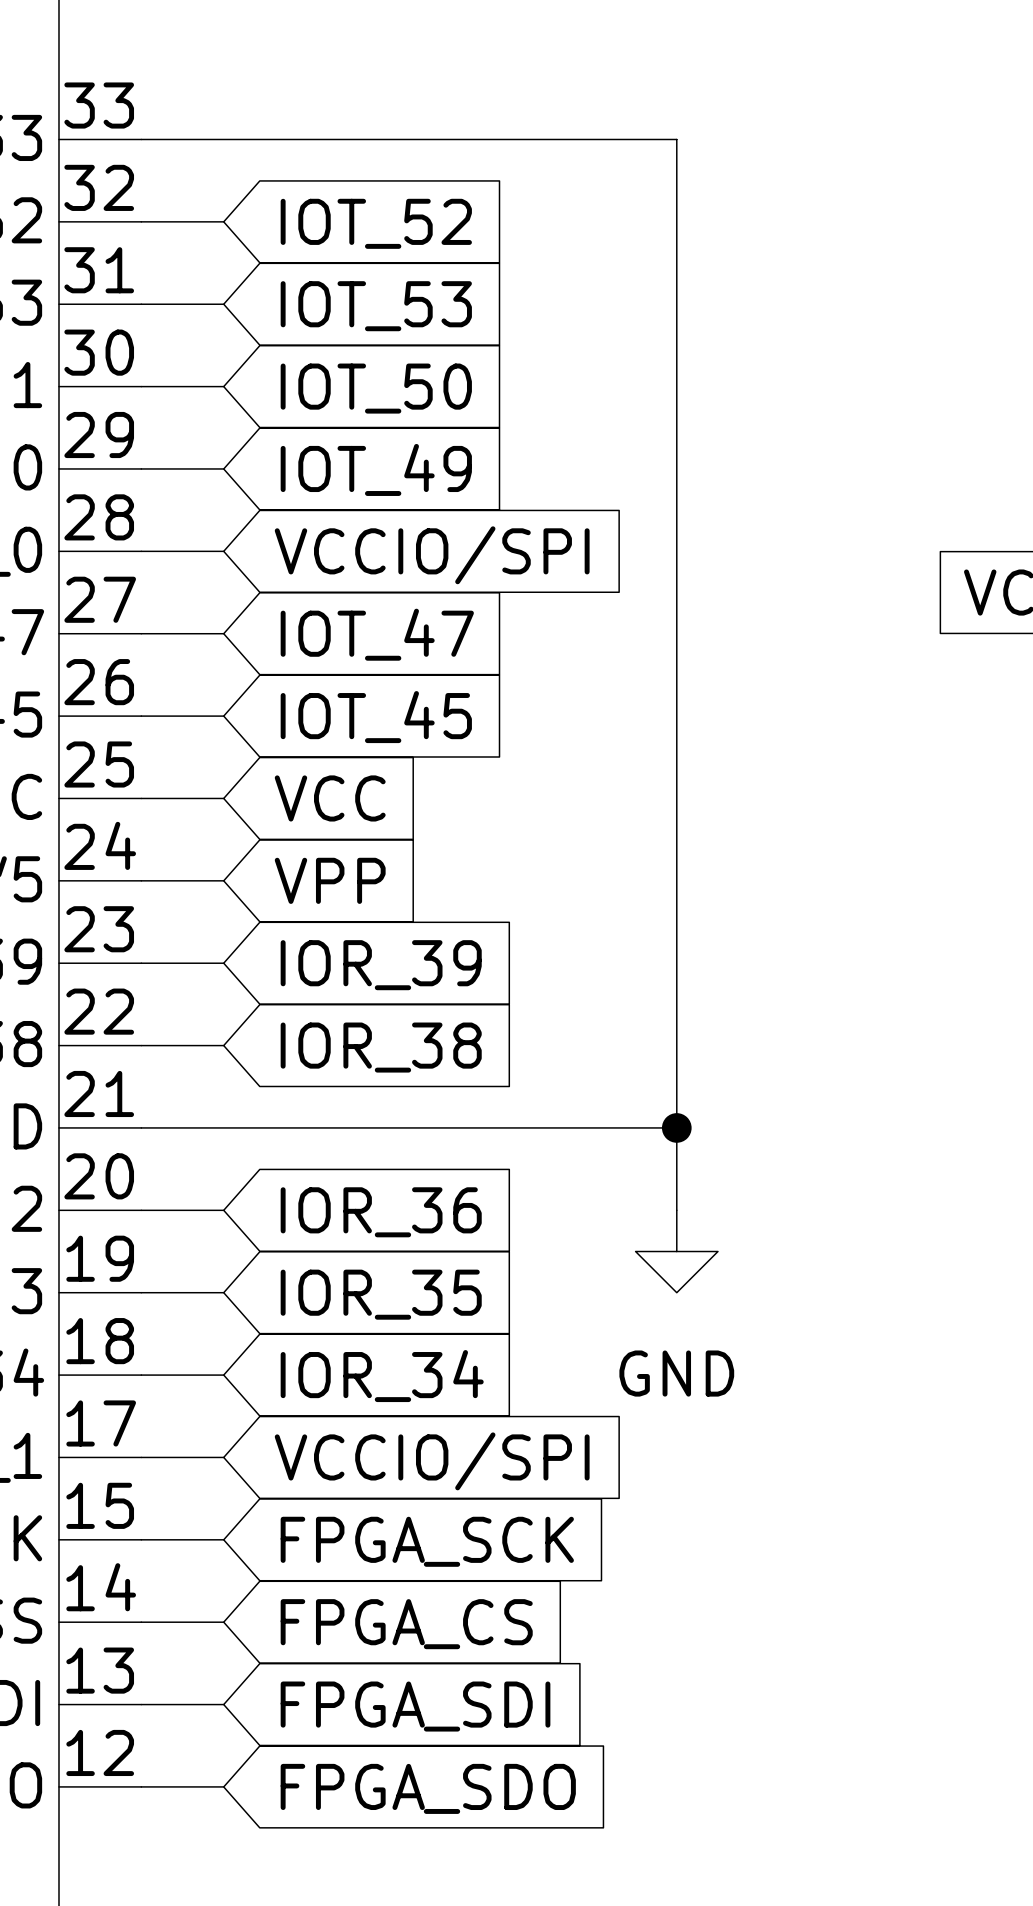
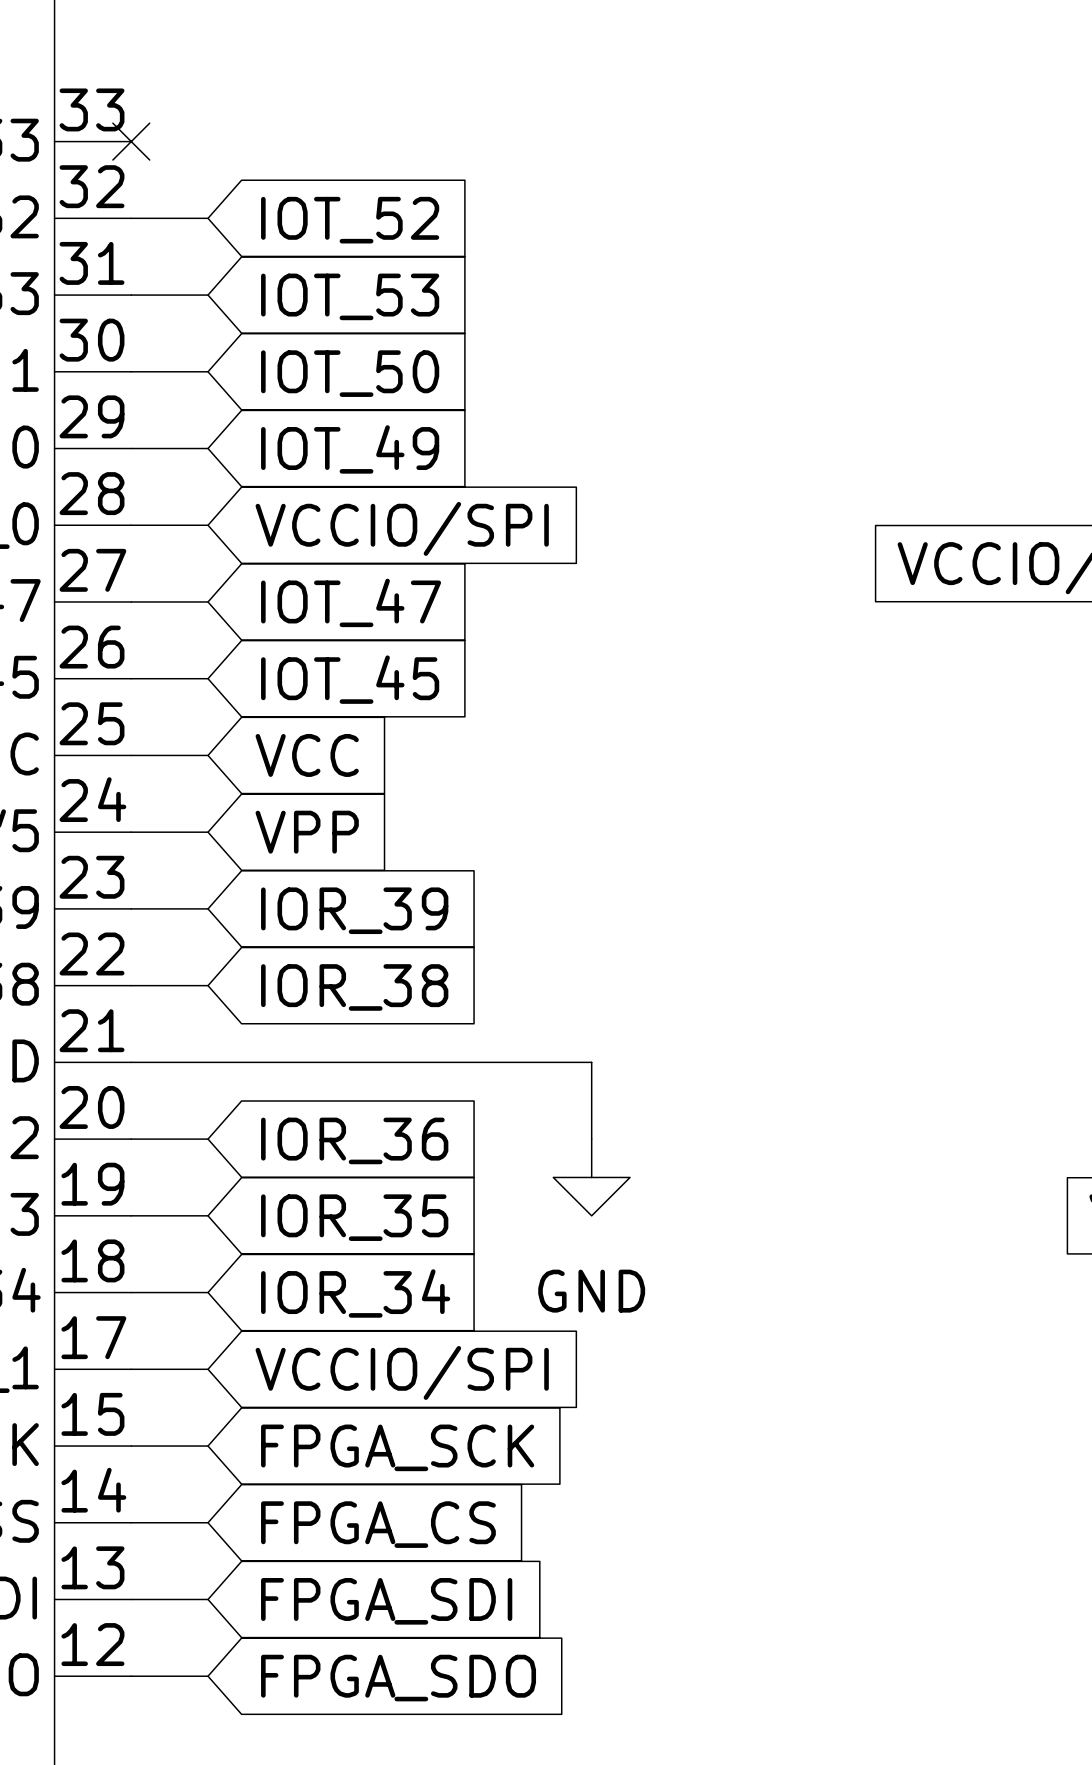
wire: (141, 139) (676, 139) (676, 1210) -> none
no-connect mark: none -> (131, 141)
wire: (635, 1127) (676, 1127) -> (591, 1062) (591, 1139)
junction: (676, 1127) -> none
power symbol position: GND (676, 1251) -> GND (591, 1177)

